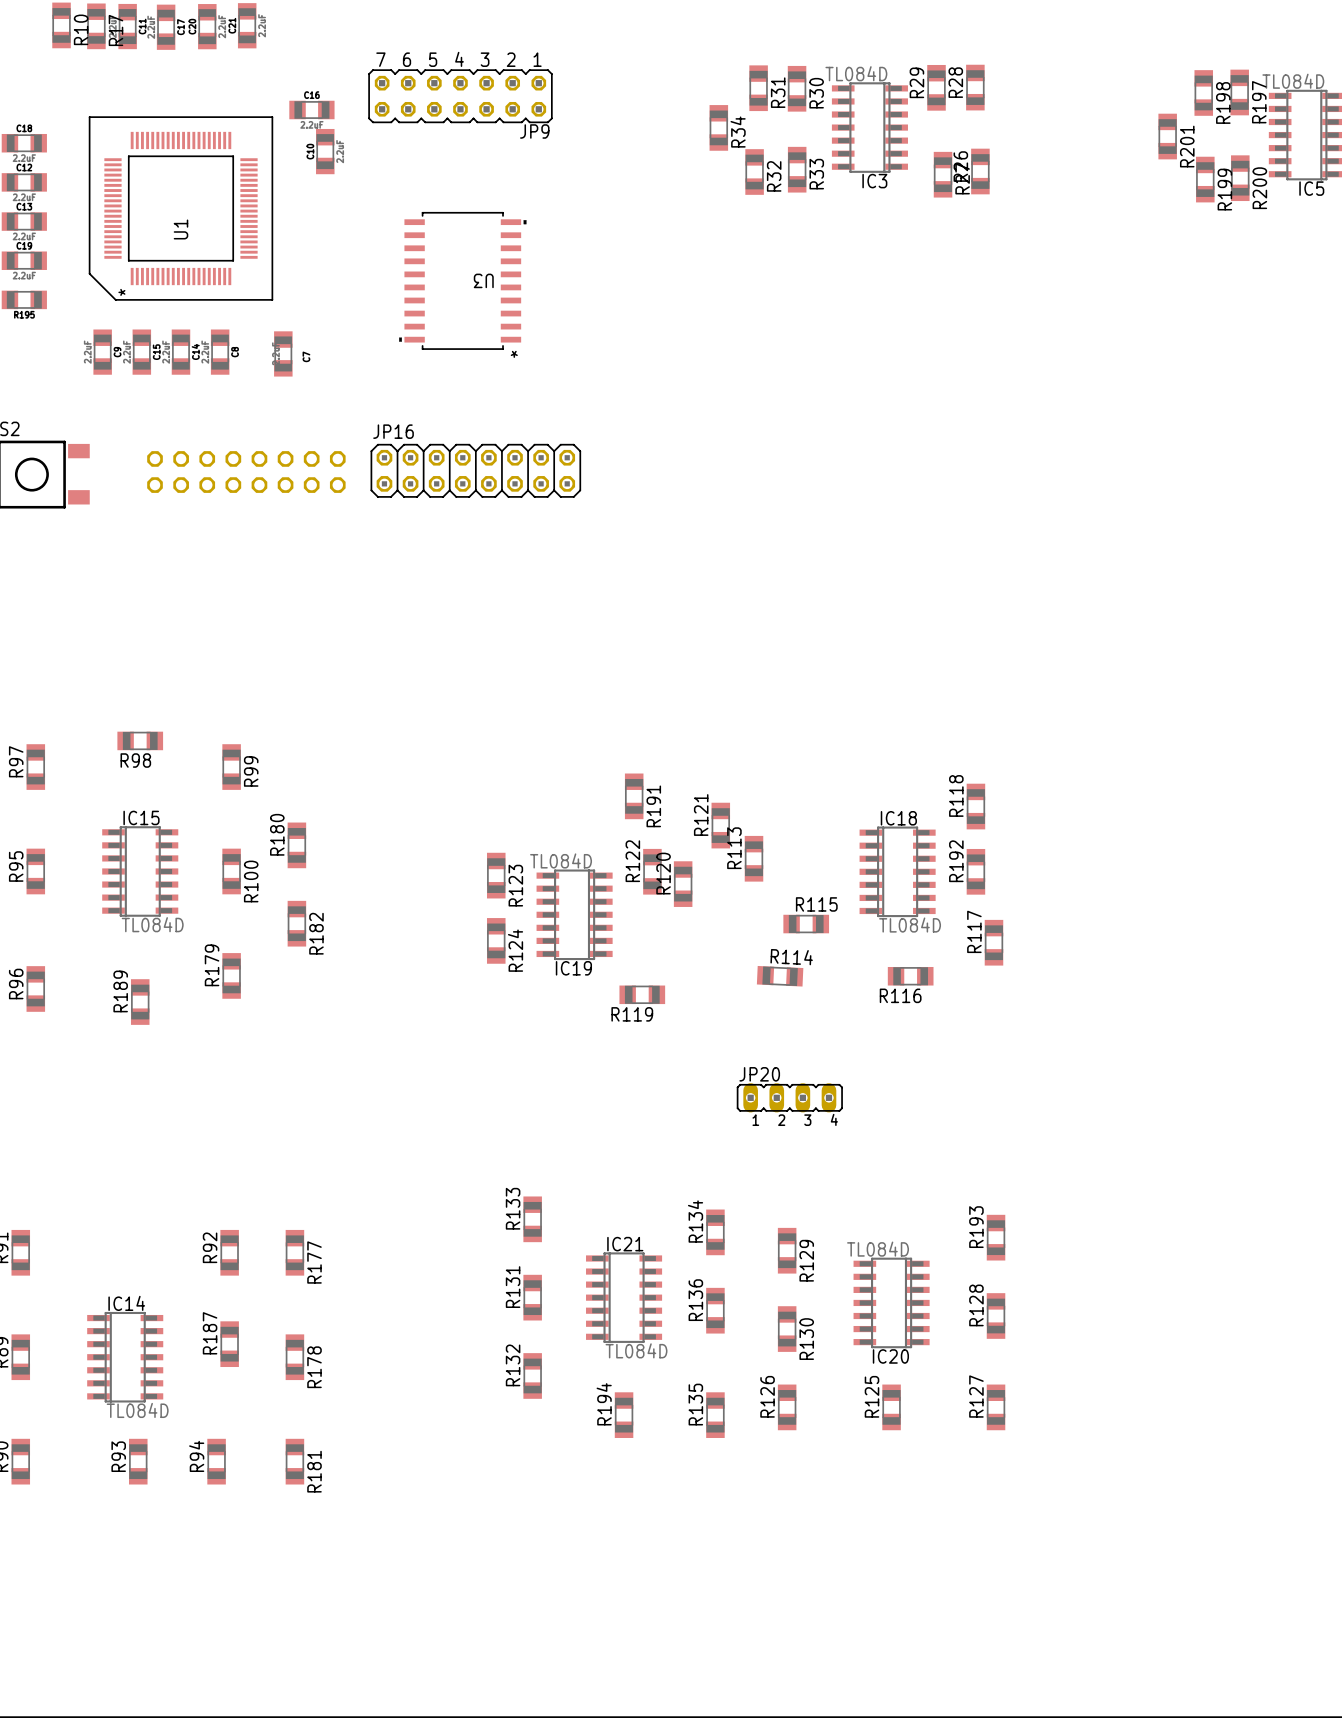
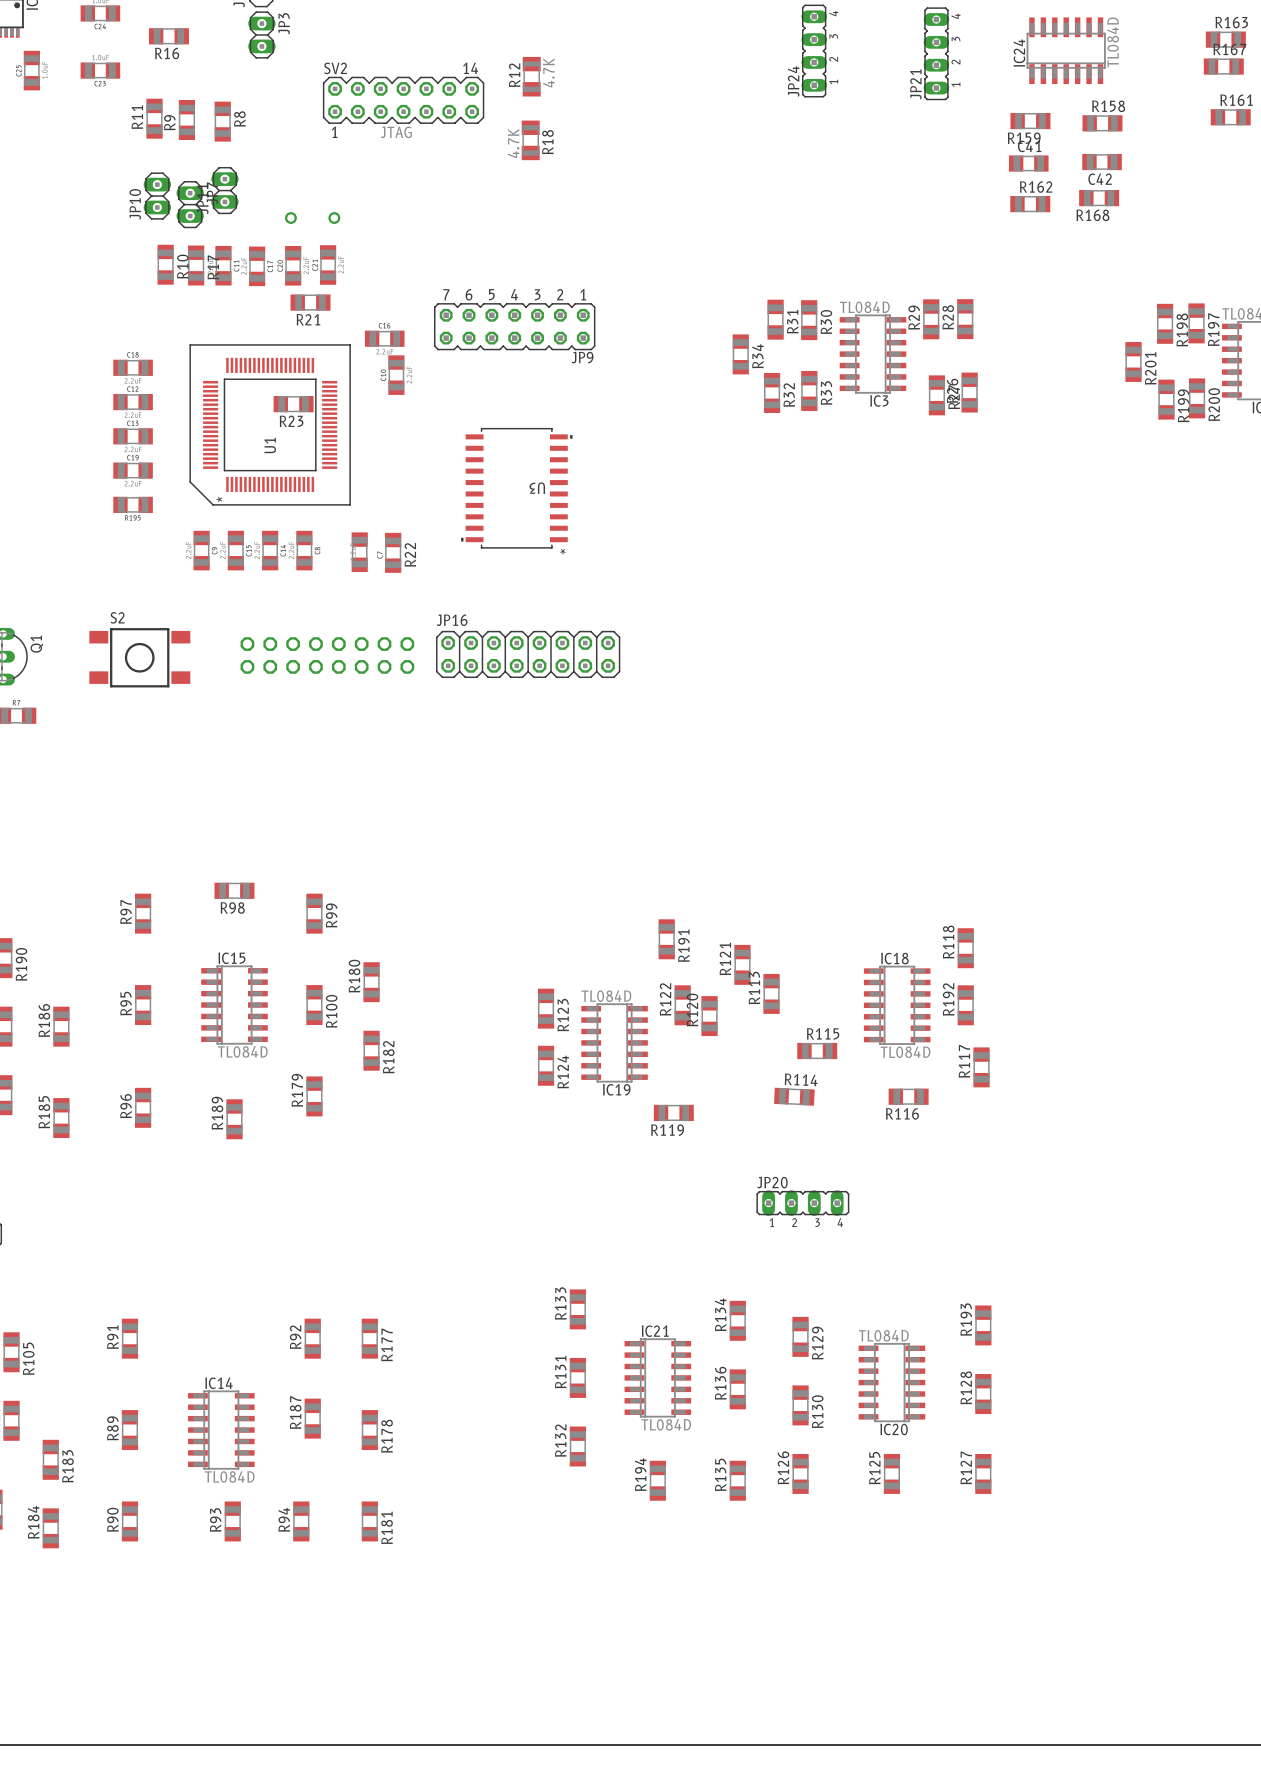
R21: none -> (310, 302)
R23: none -> (293, 404)
R22: none -> (393, 552)

